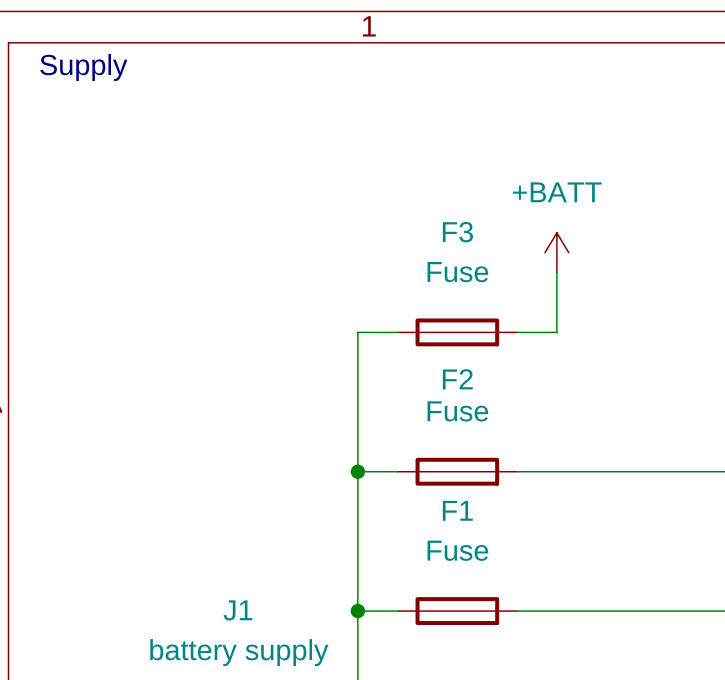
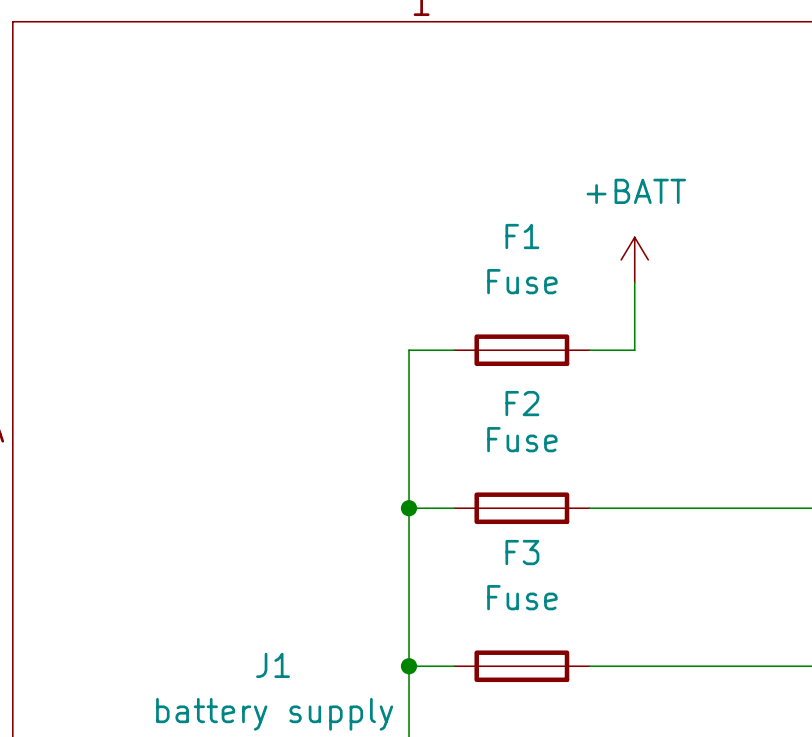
text: Supply (83, 67) -> none
F3 name: F3 (457, 232) -> F1 (522, 236)
F1 name: F1 (457, 510) -> F3 (522, 552)

